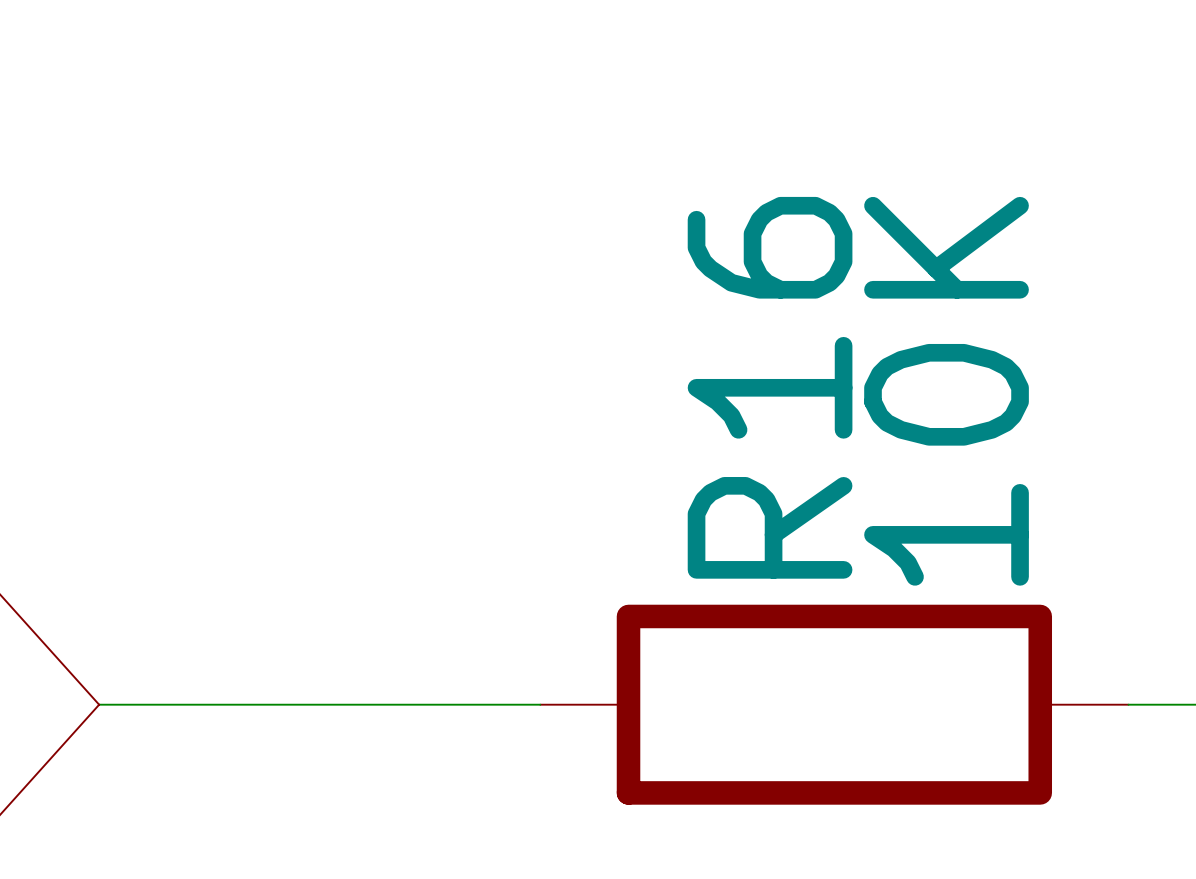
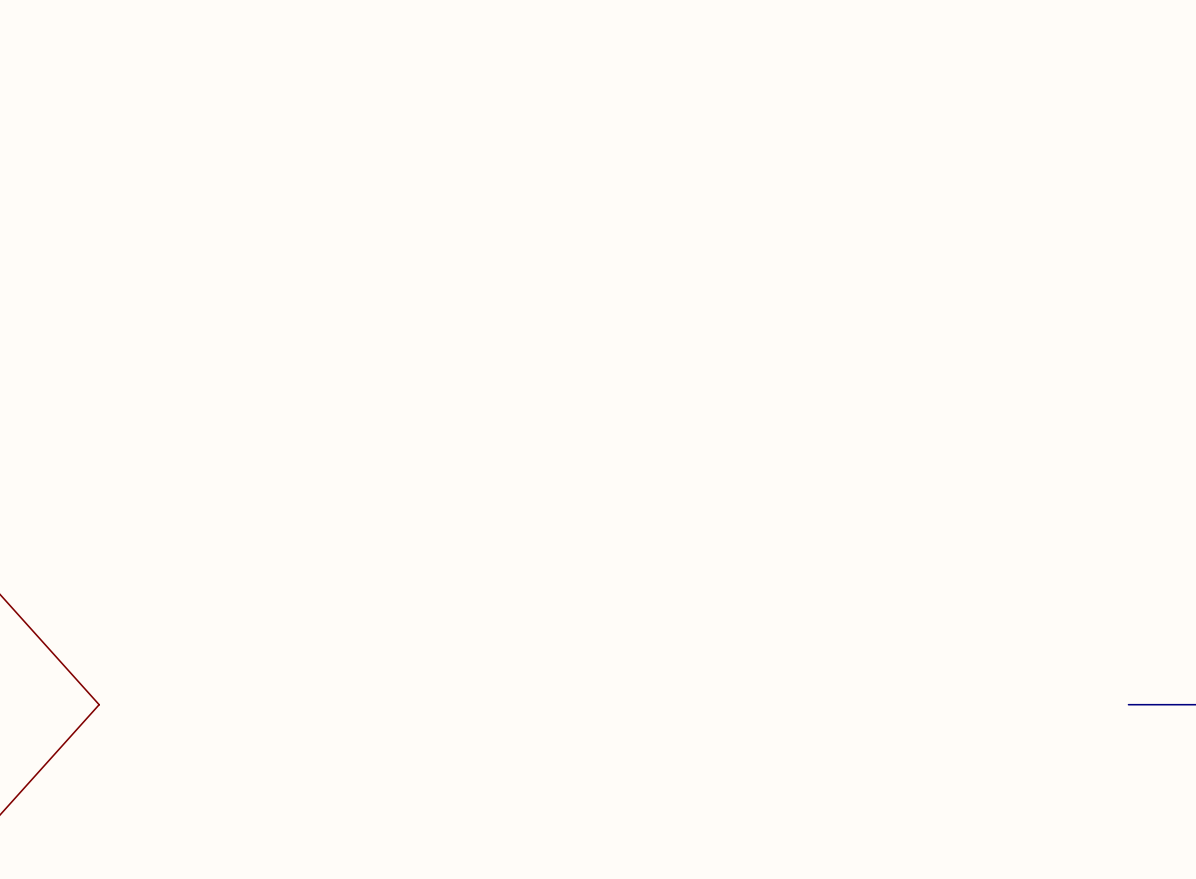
wire: (99, 704) (540, 704) -> none
R16: 10K (834, 704) -> none

